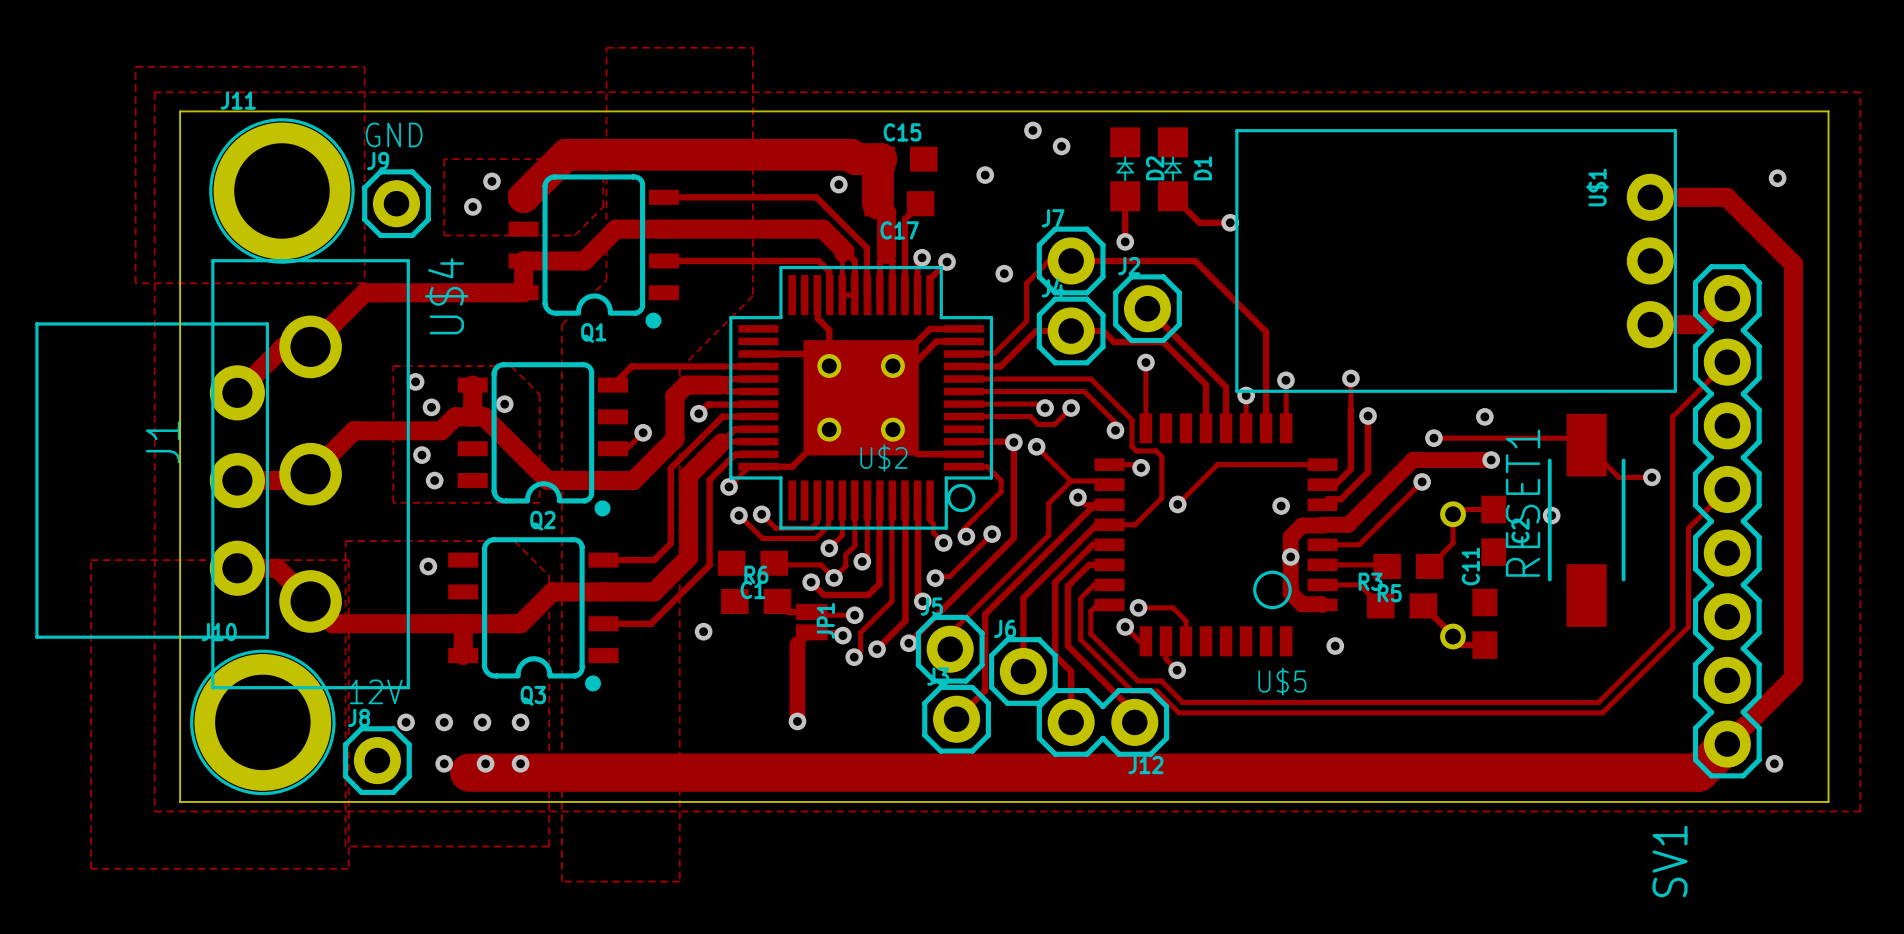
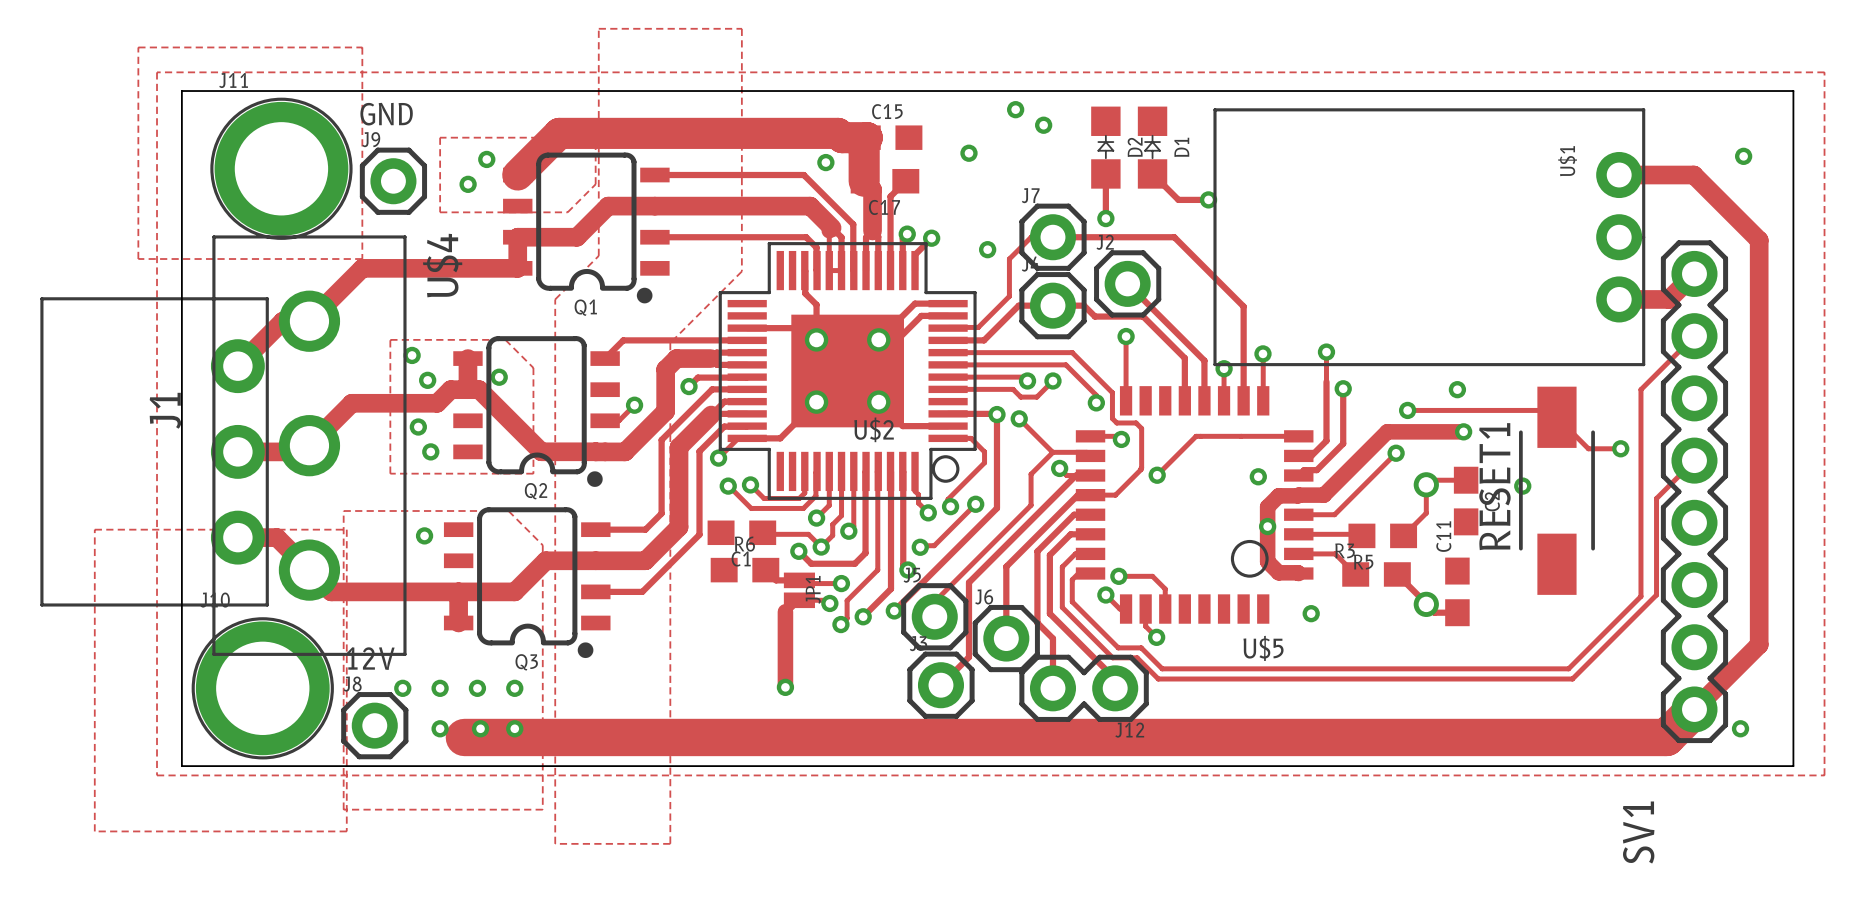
via: (703, 631) -> none

